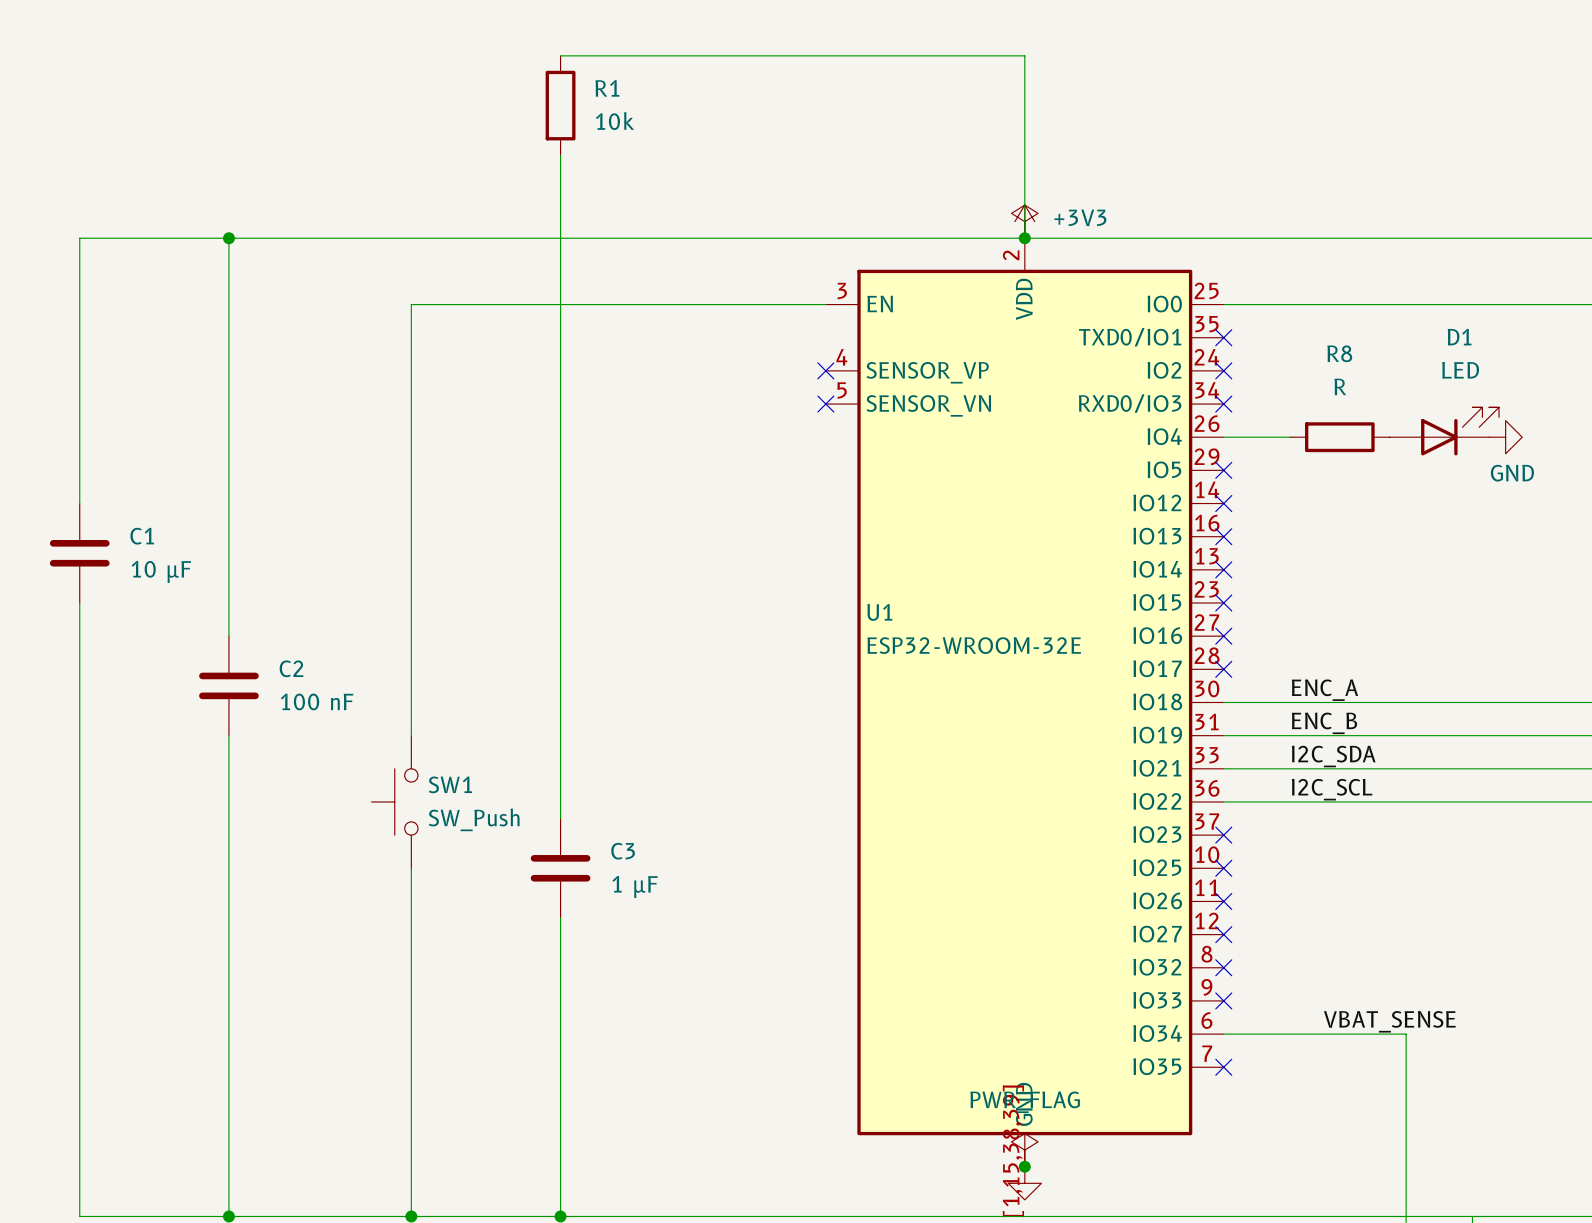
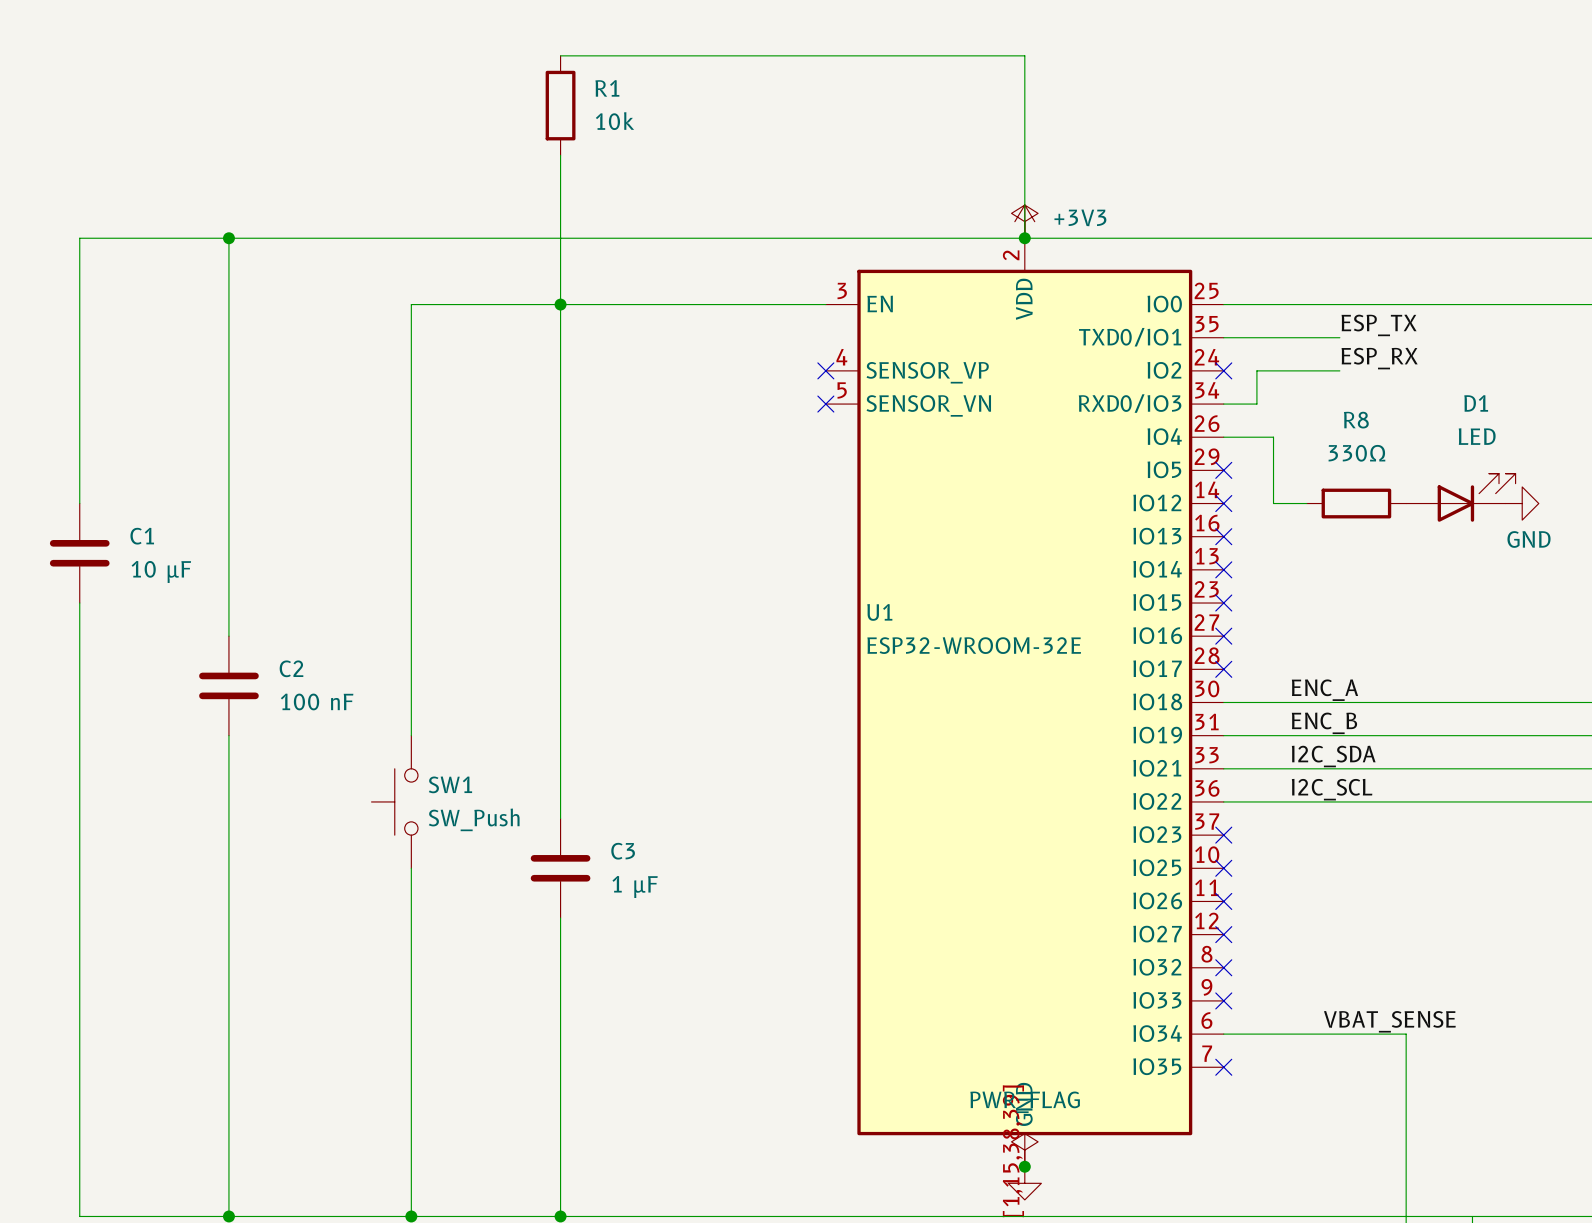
junction: none -> (560, 304)
label: none -> ESP_TX (1379, 325)
wire: none -> (1223, 337) (1339, 337)
no-connect mark: (1223, 337) -> none
label: none -> ESP_RX (1379, 358)
wire: none -> (1339, 370) (1256, 370) (1256, 404) (1223, 404)
R8 value: R (1340, 386) -> 330Ω (1356, 453)
no-connect mark: (1223, 404) -> none
D1 position: (1444, 431) -> (1460, 497)
wire: (1273, 437) (1290, 437) -> (1273, 437) (1273, 503) (1306, 503)
R8 position: (1339, 437) -> (1356, 503)
power symbol position: GND (1505, 437) -> GND (1522, 503)

